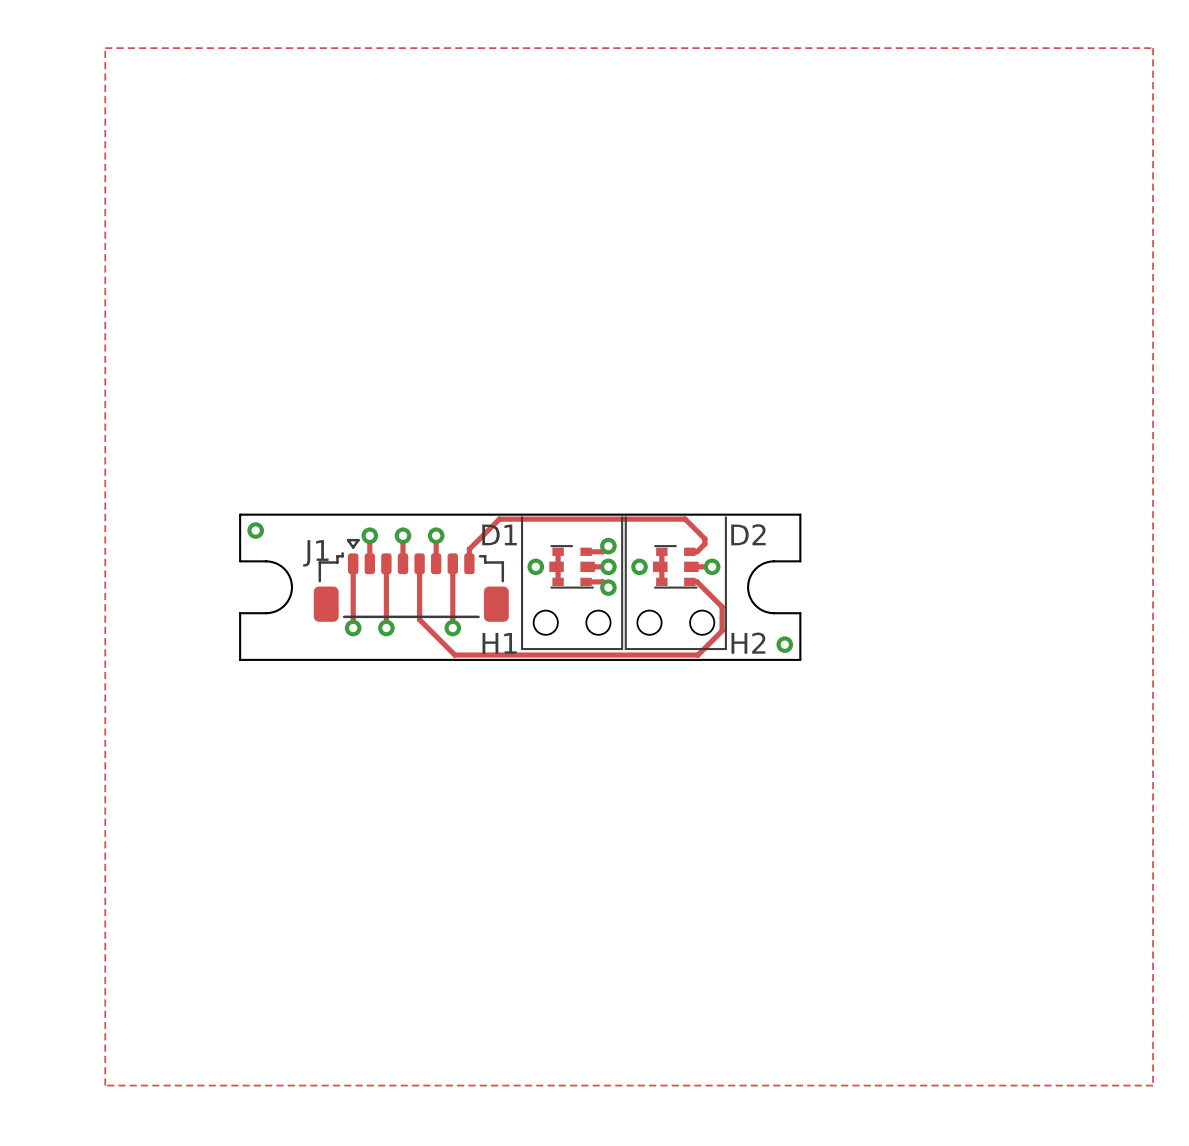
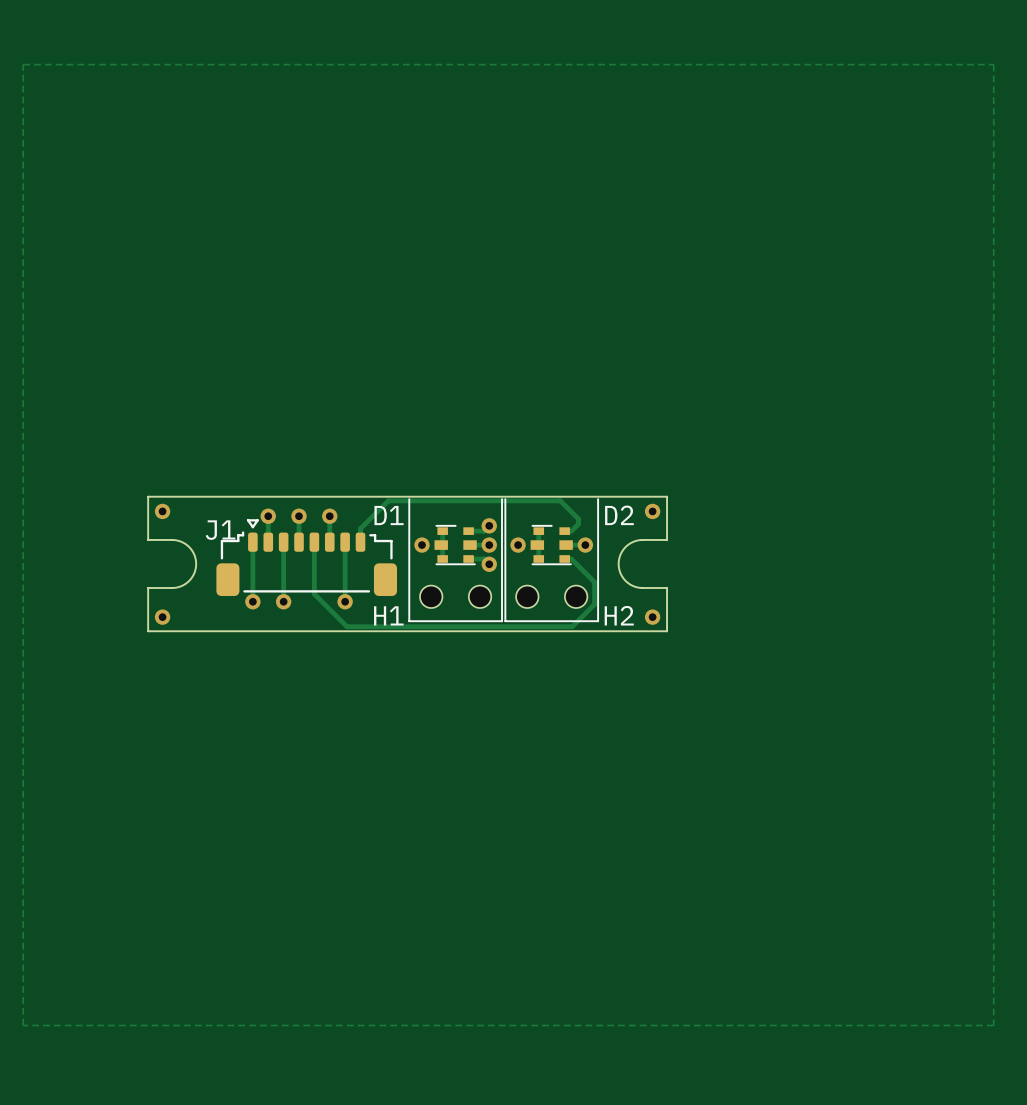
via: none -> (652, 511)
via: none -> (162, 617)

